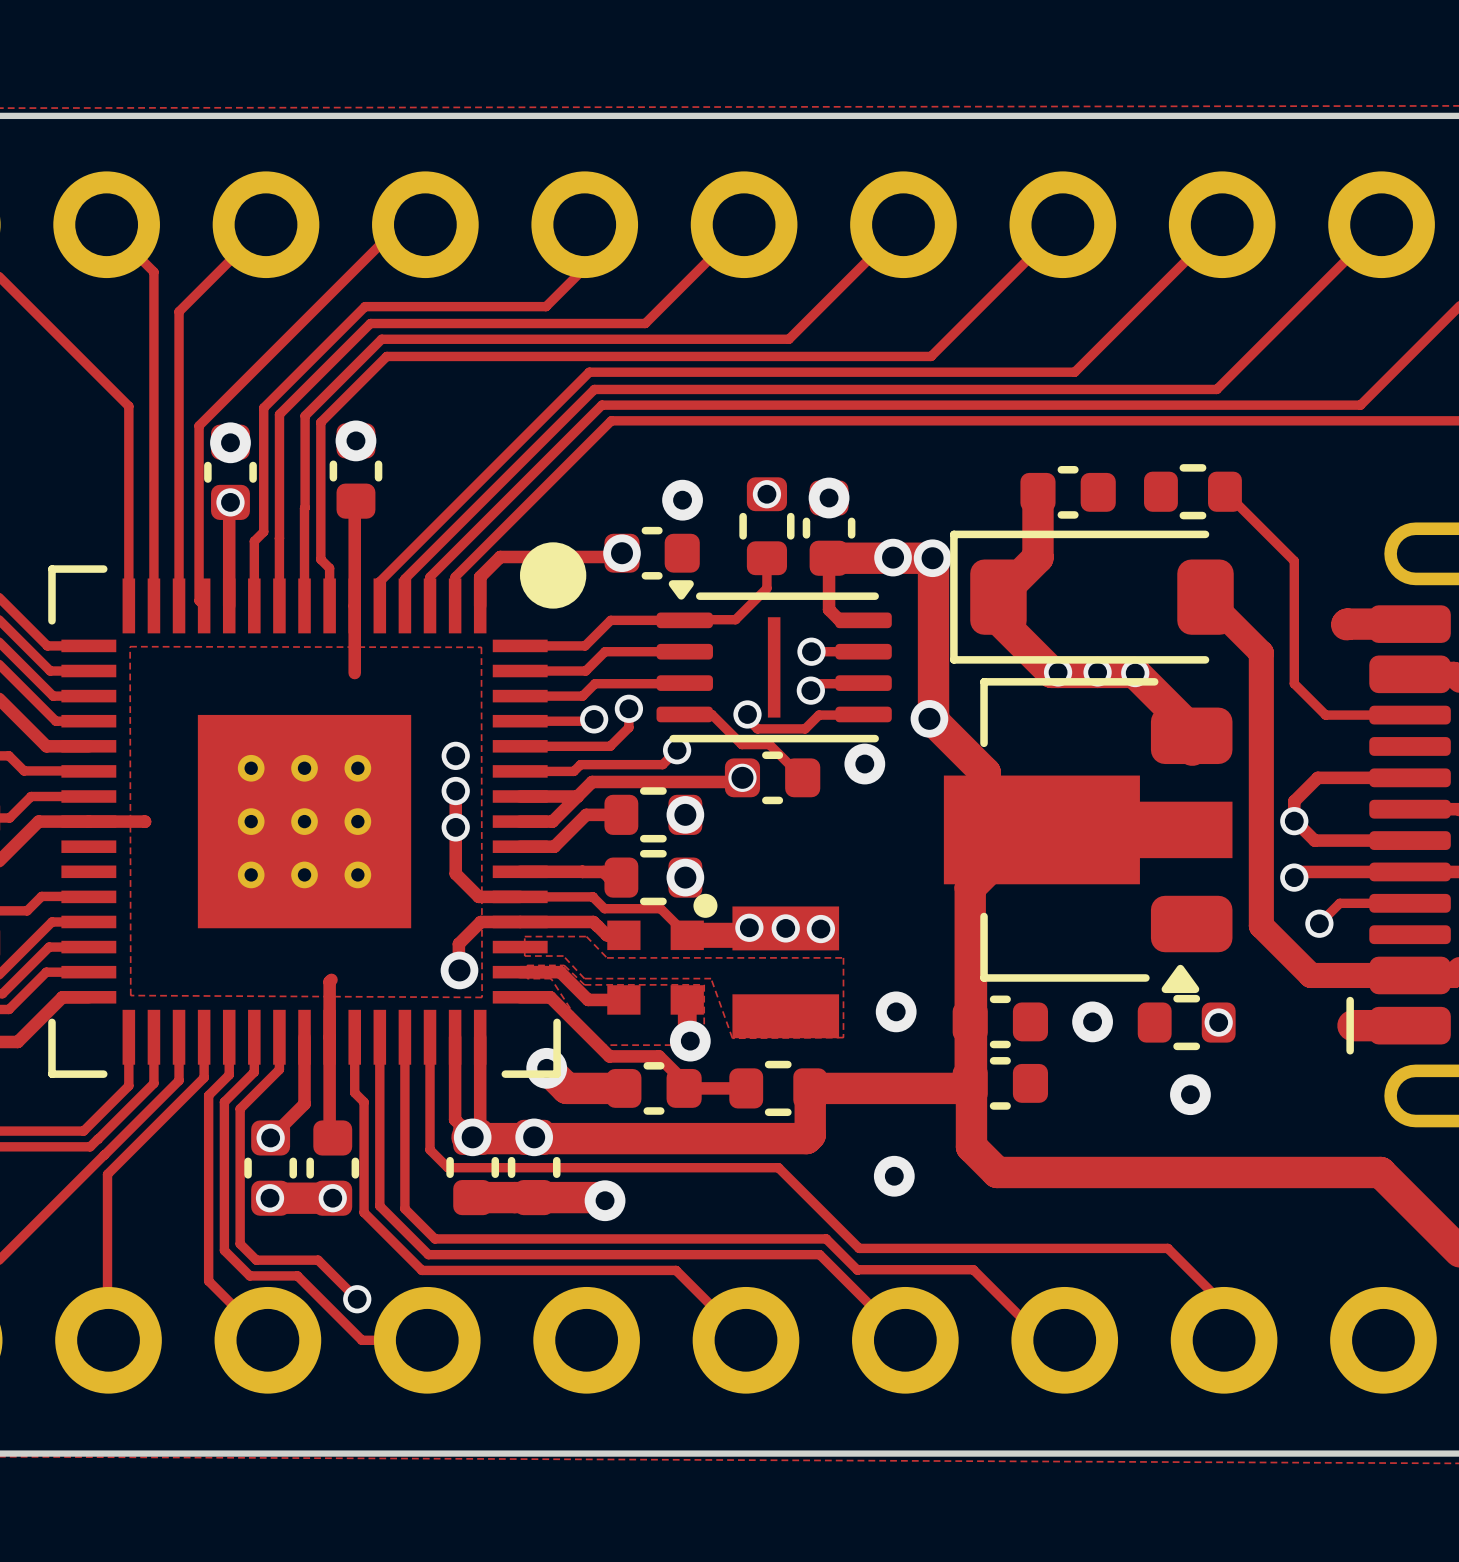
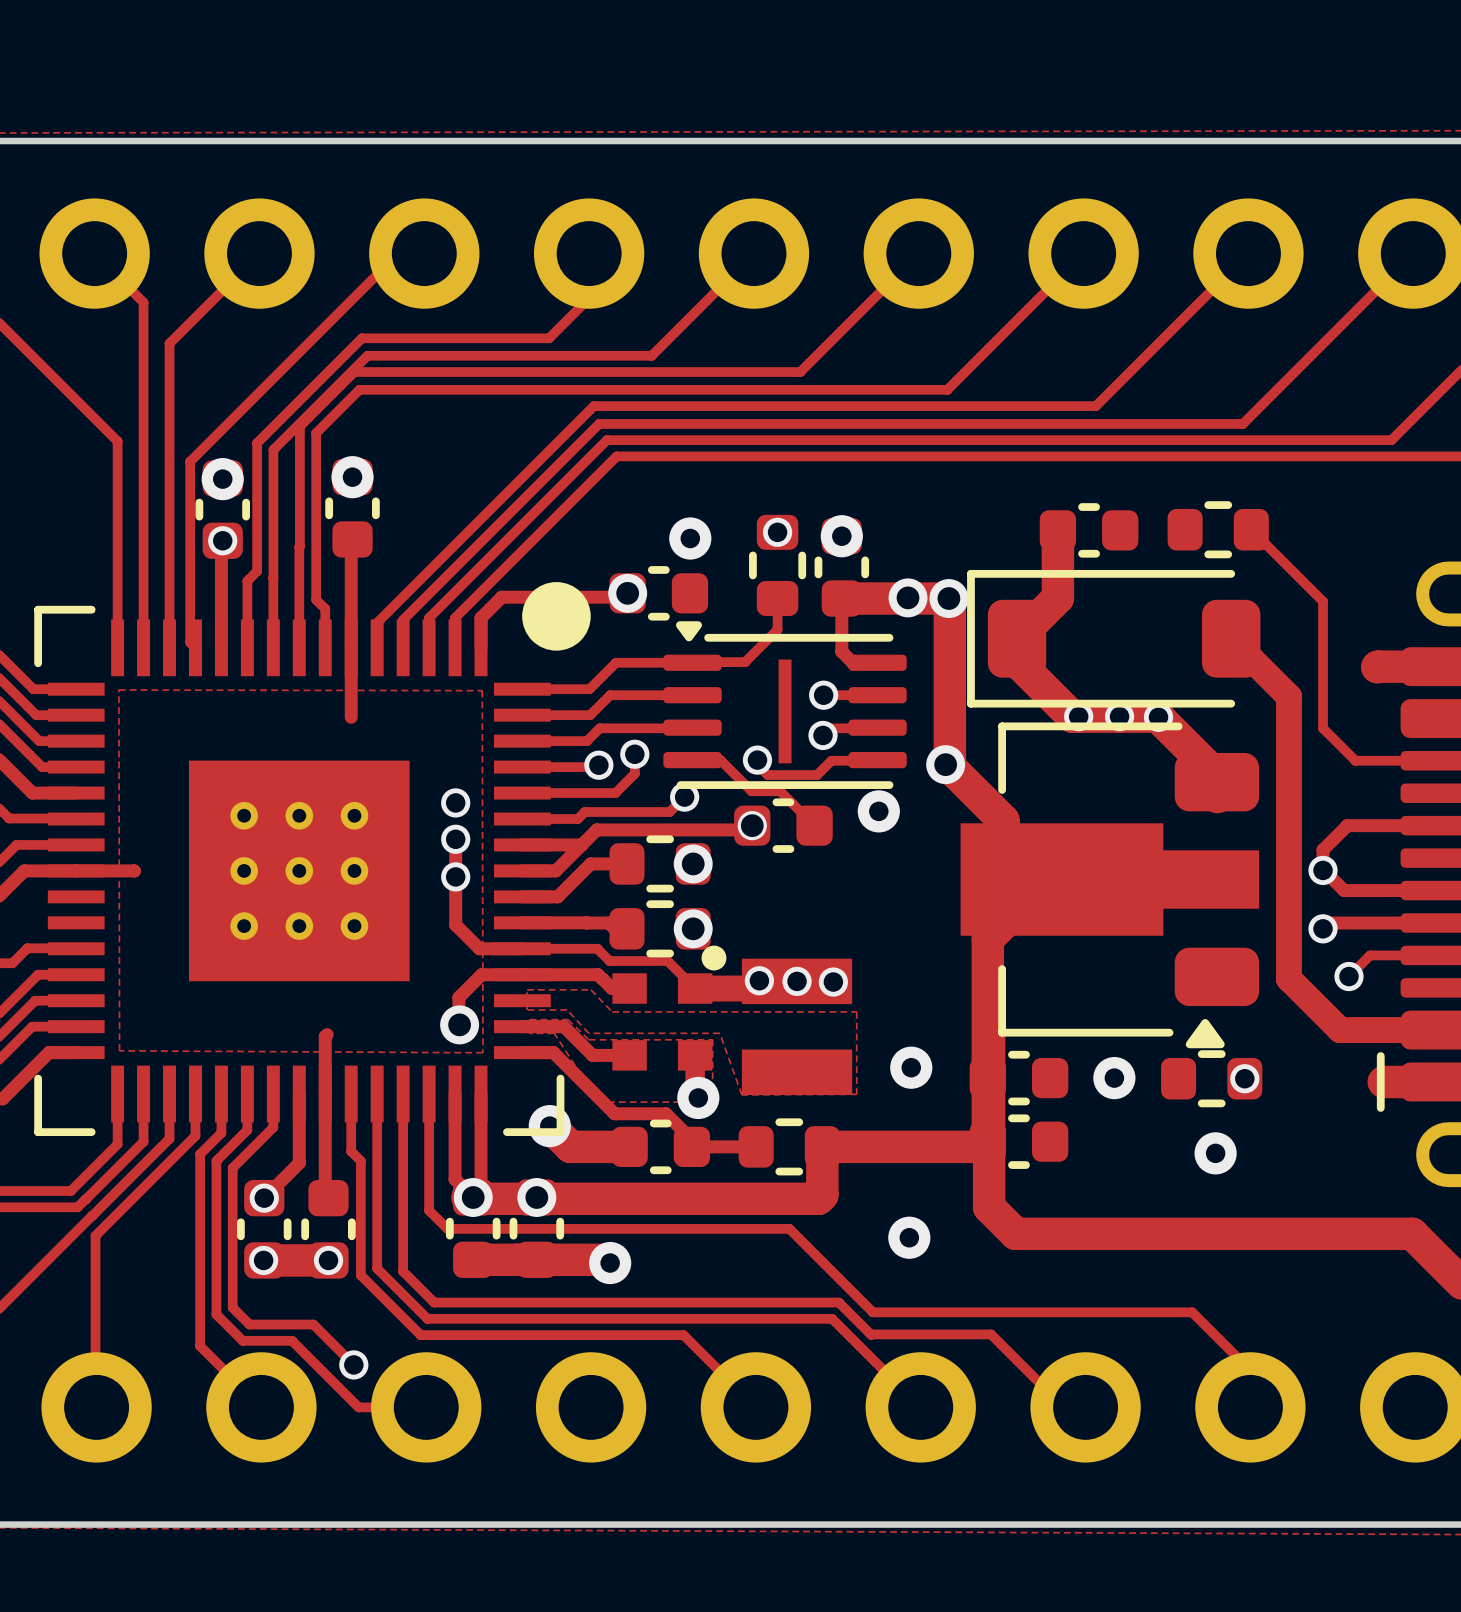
track: (381, 339) (305, 415) -> (379, 372) (354, 372) (299, 426) (299, 451)
track: (386, 356) (320, 422) -> (384, 389) (359, 389) (316, 433) (316, 458)

